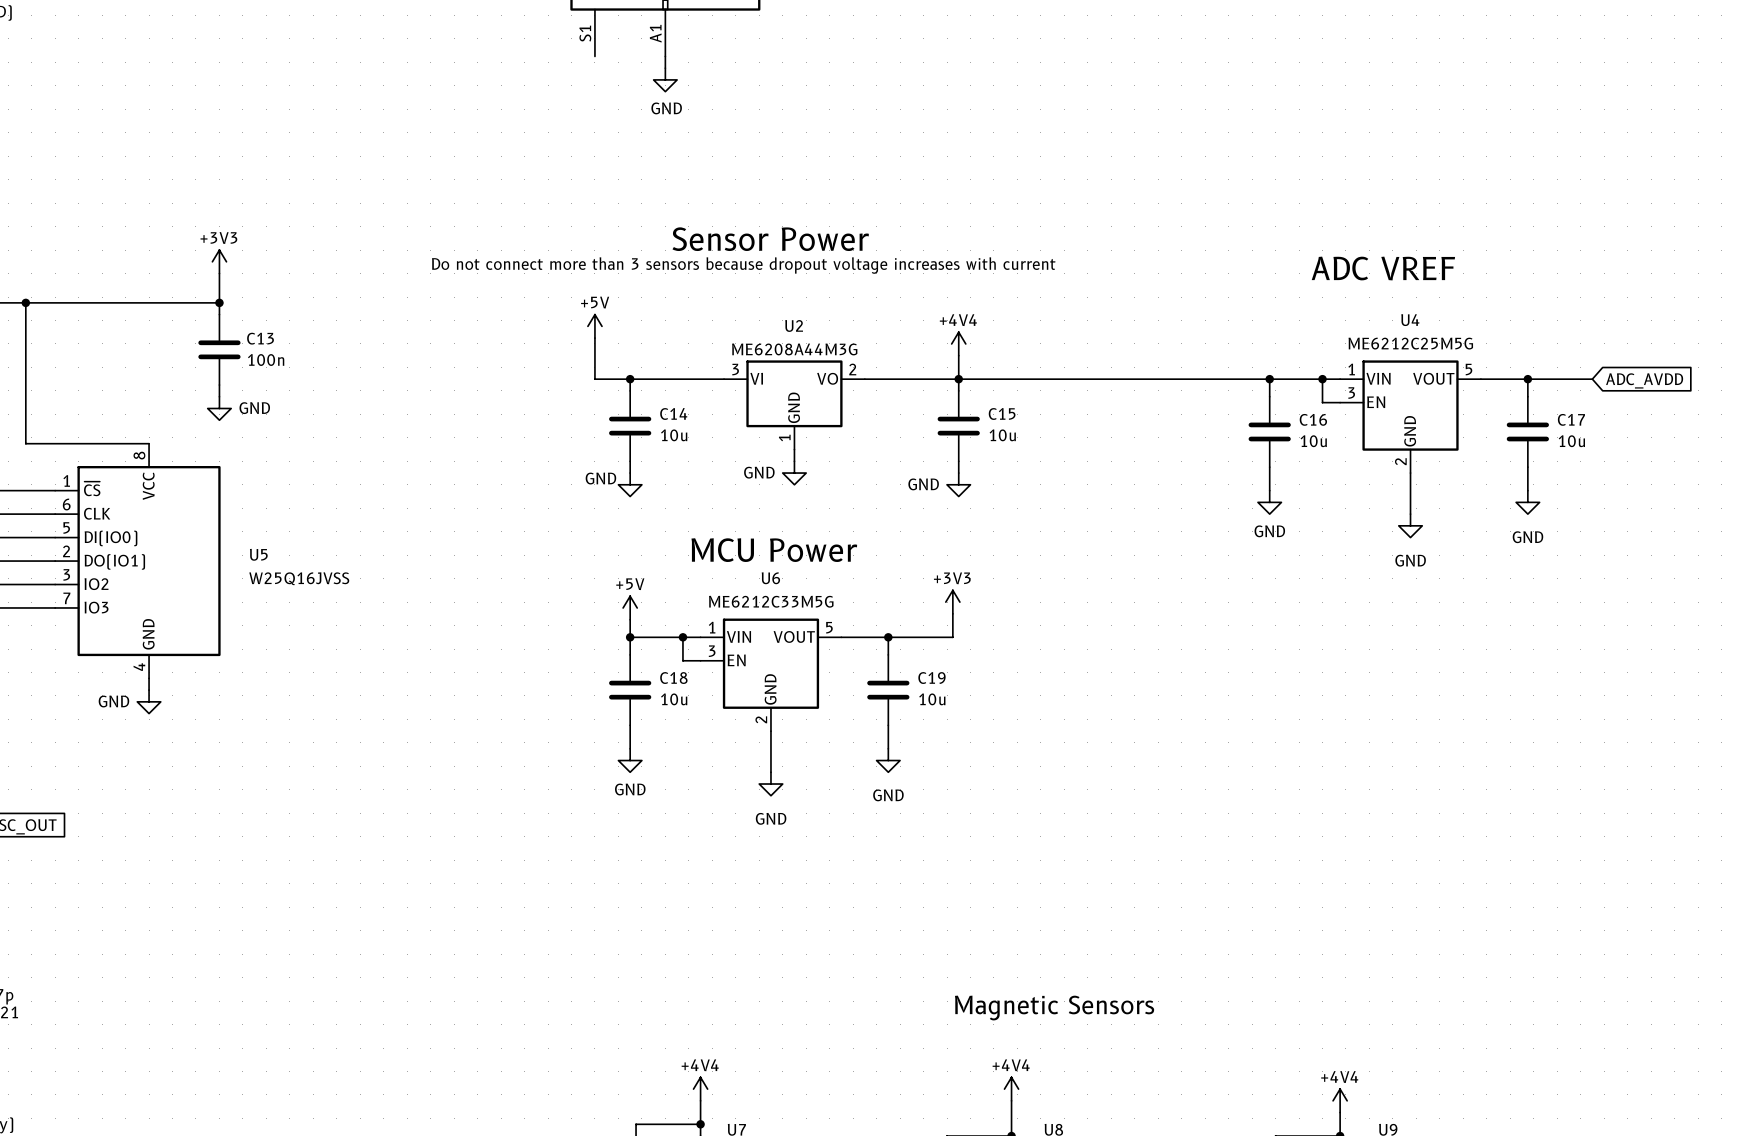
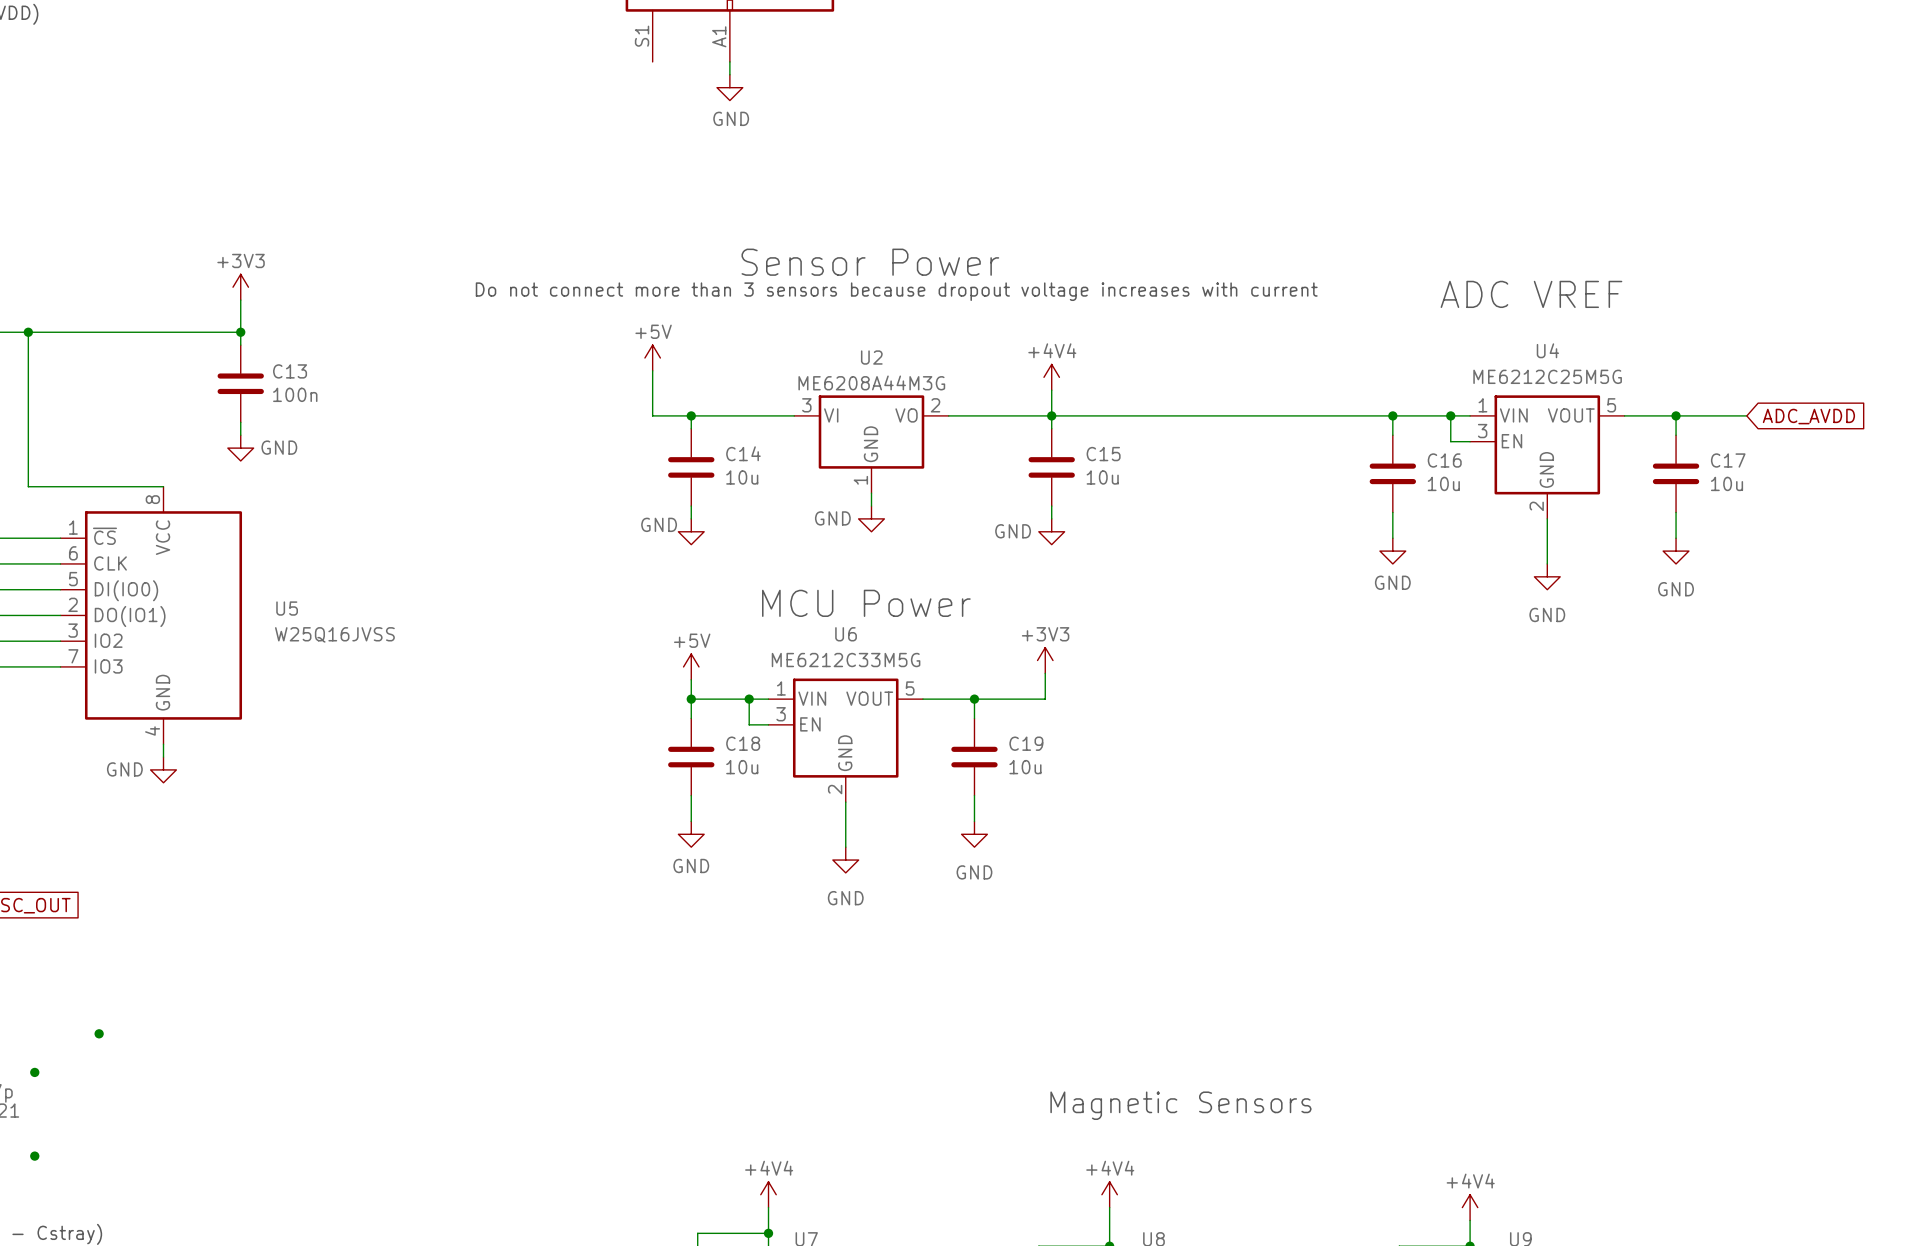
junction: none -> (99, 1033)
junction: none -> (34, 1072)
junction: none -> (34, 1156)

